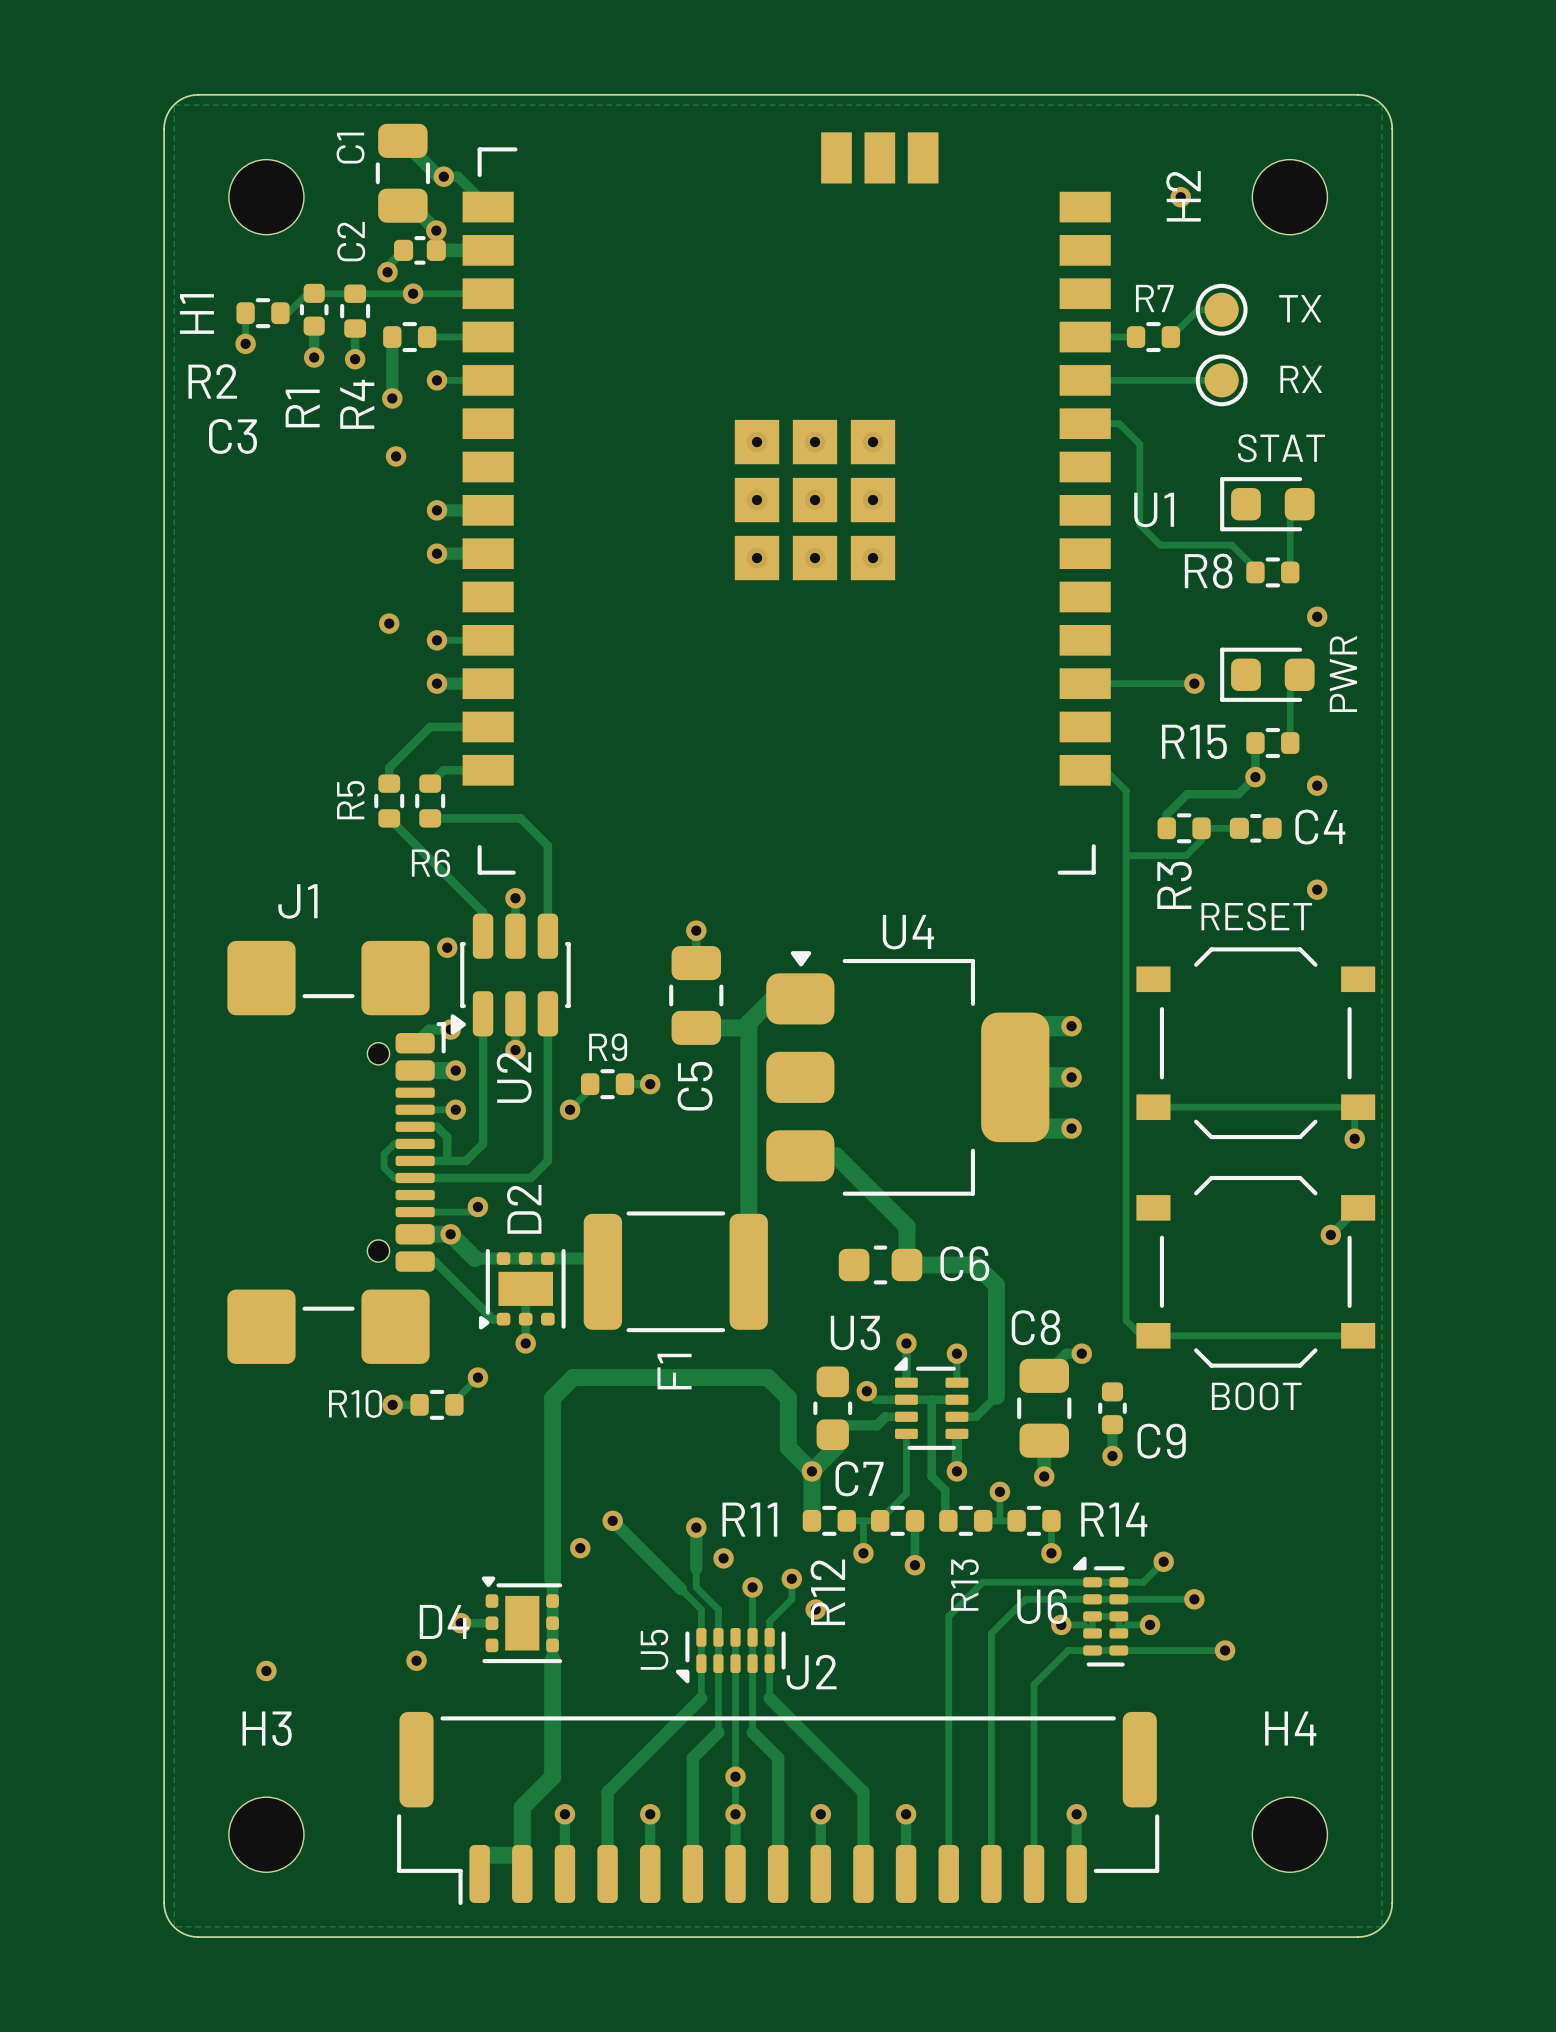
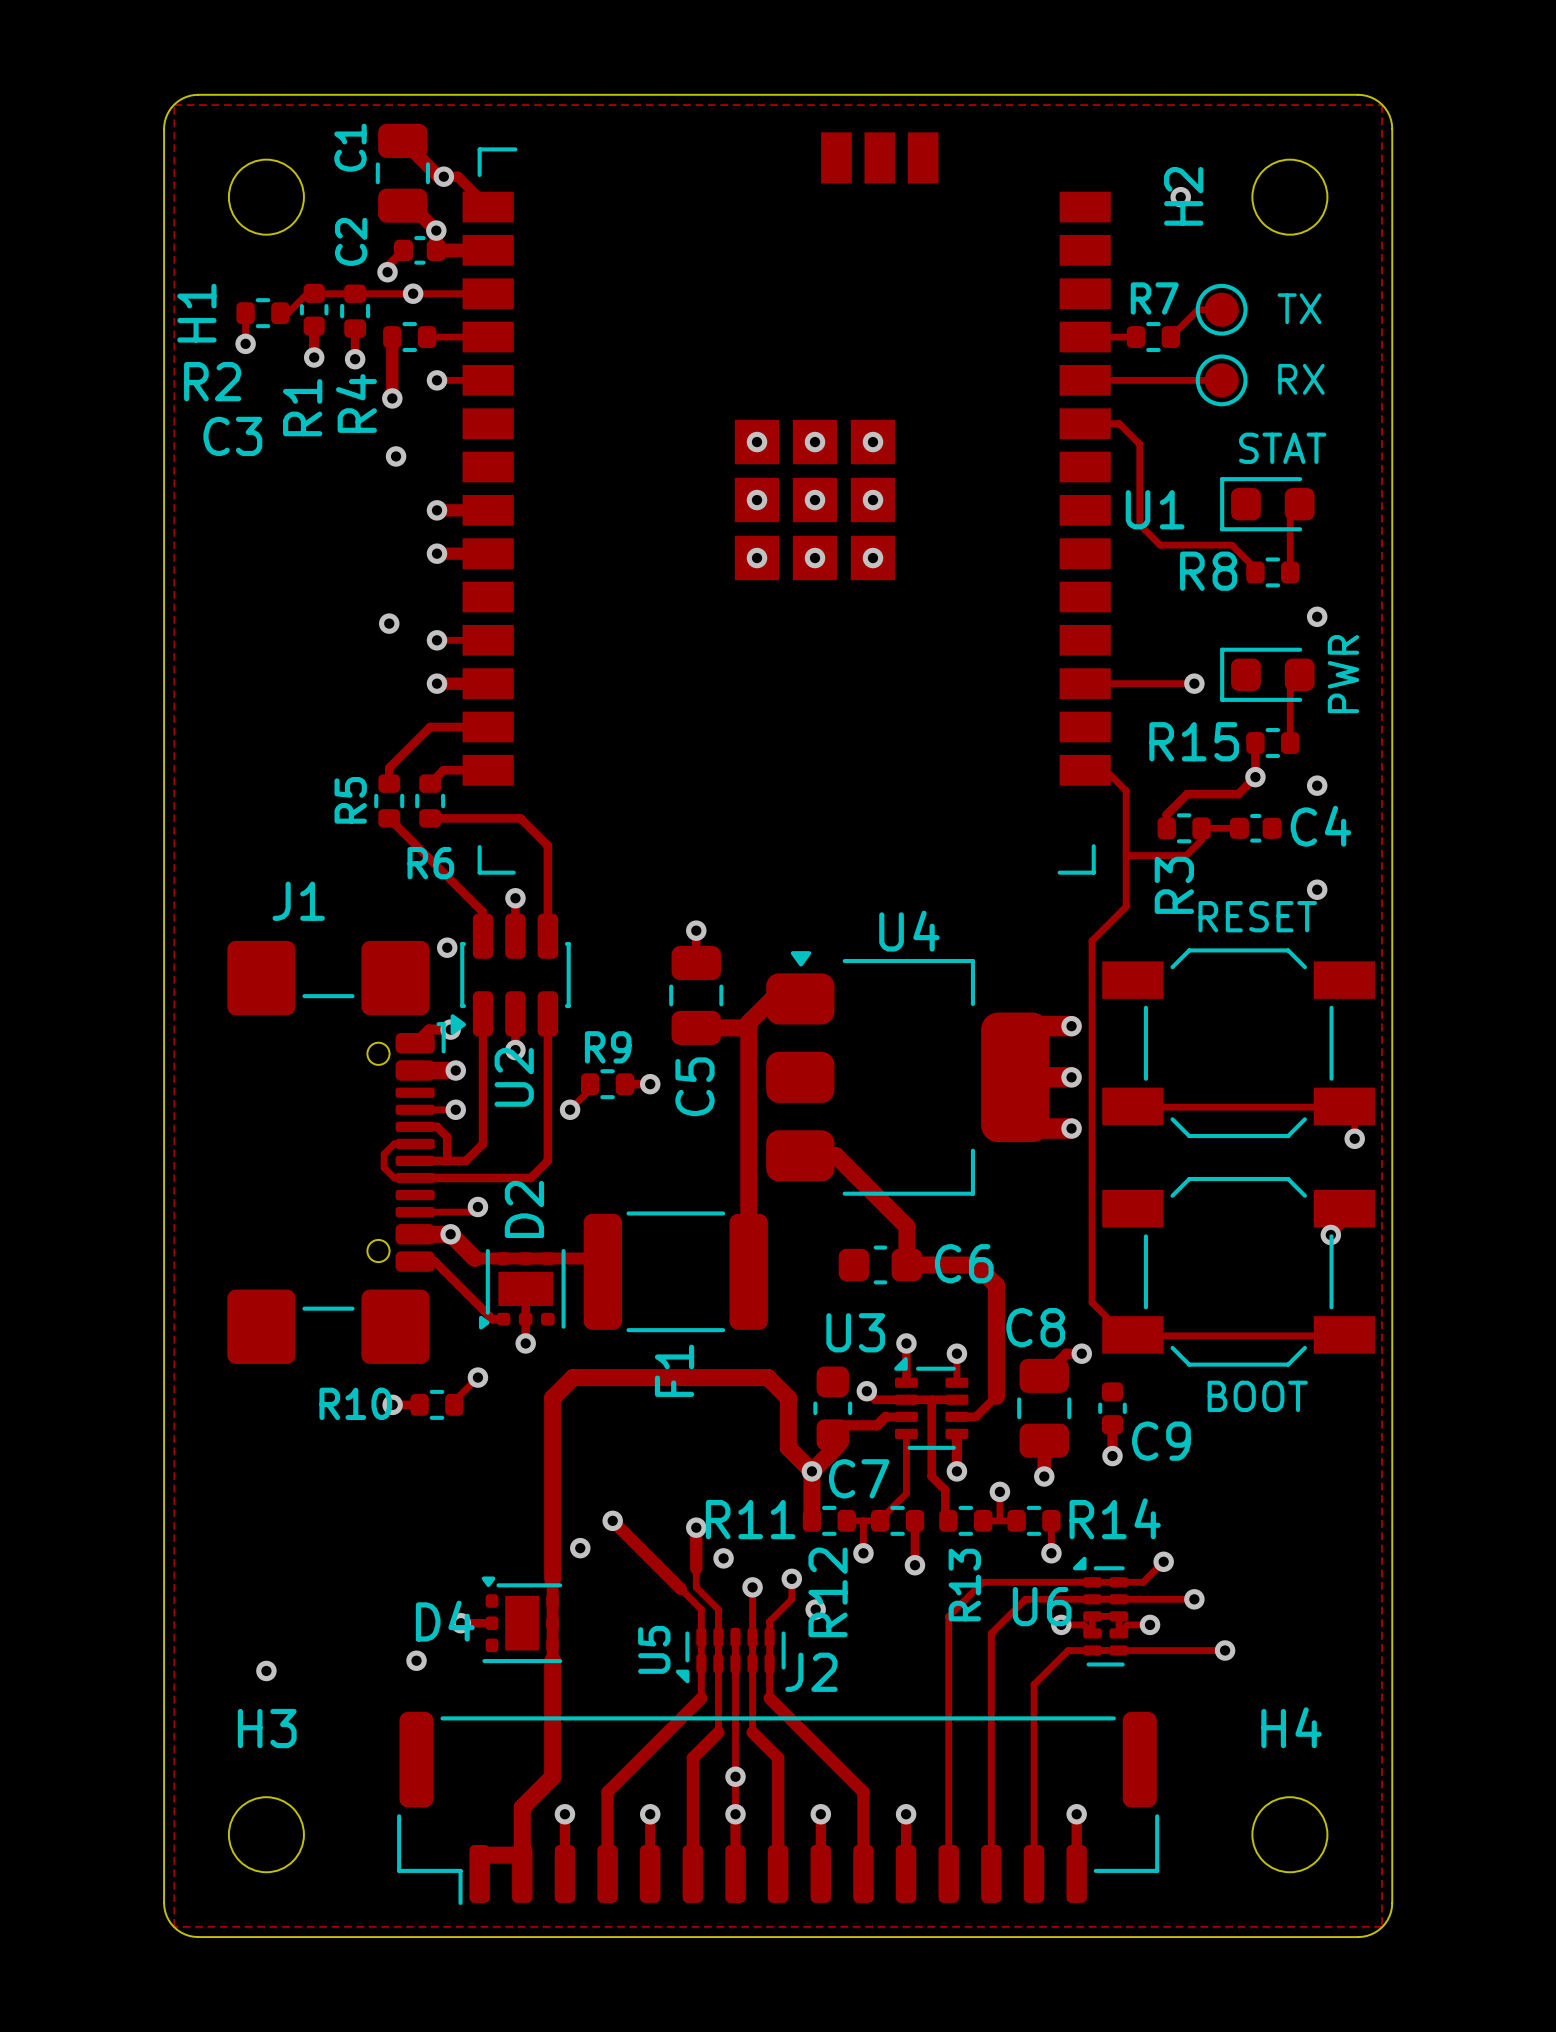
track: (1126, 906) (1126, 1320) (1141, 1335) -> (1126, 906) (1092, 940) (1092, 1302) (1125, 1335) (1141, 1335)
part footprint: [1136, 947, 1376, 1140] -> [1102, 948, 1376, 1139]
part footprint: [1136, 1175, 1376, 1368] -> [1102, 1176, 1376, 1367]

